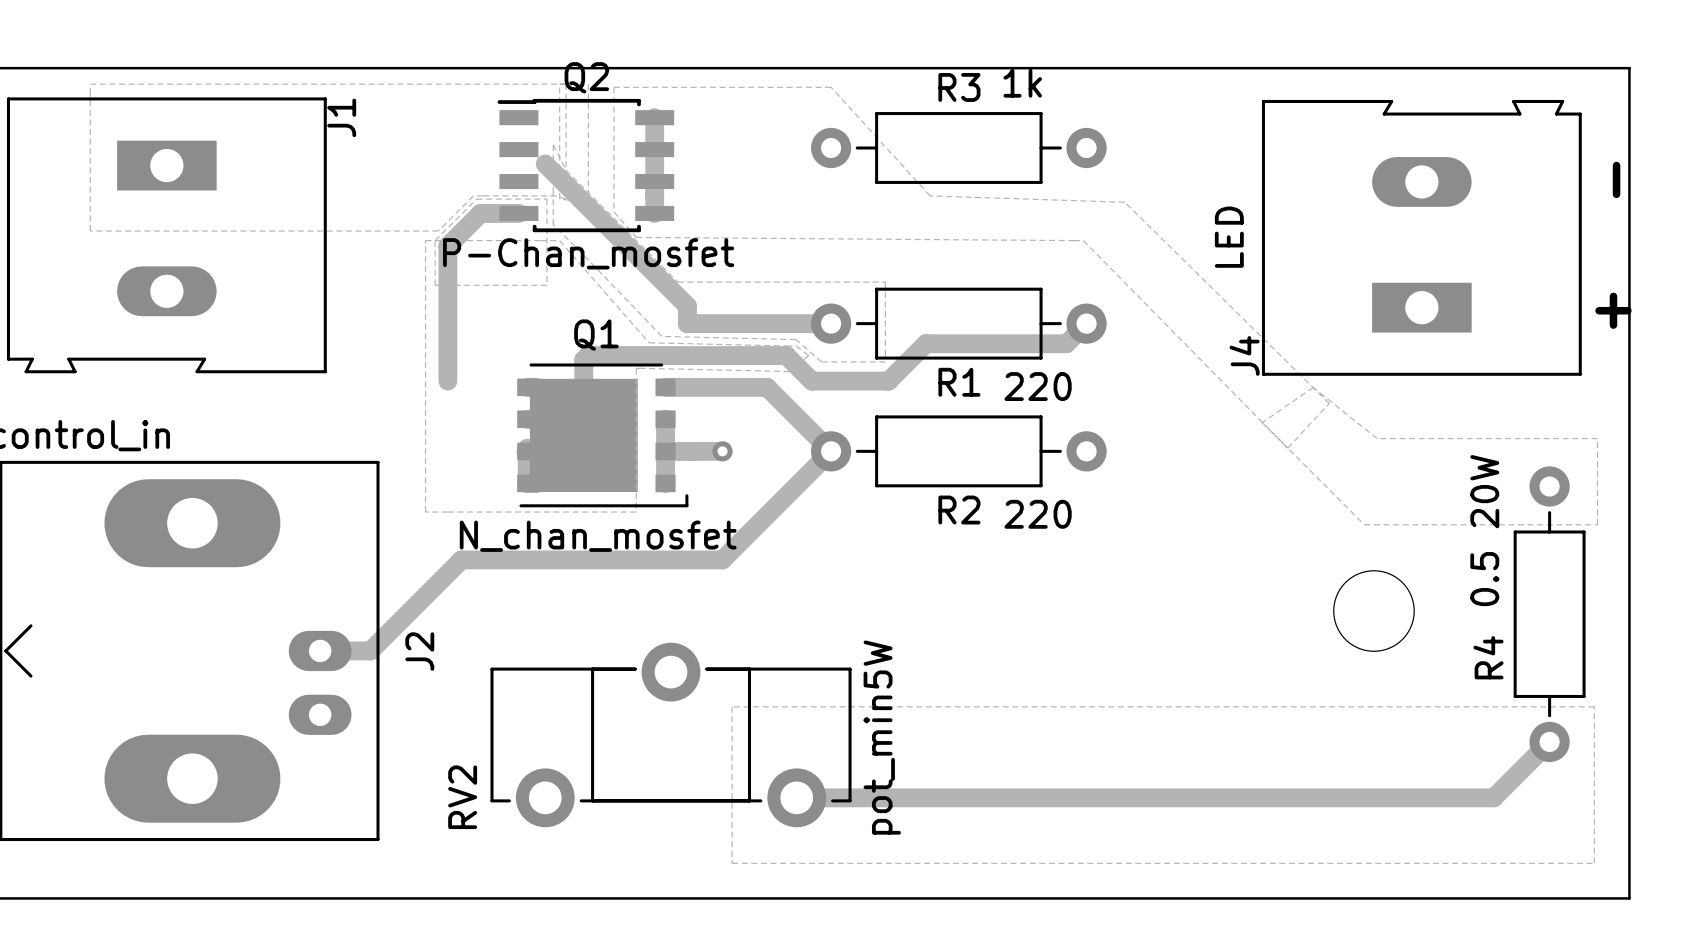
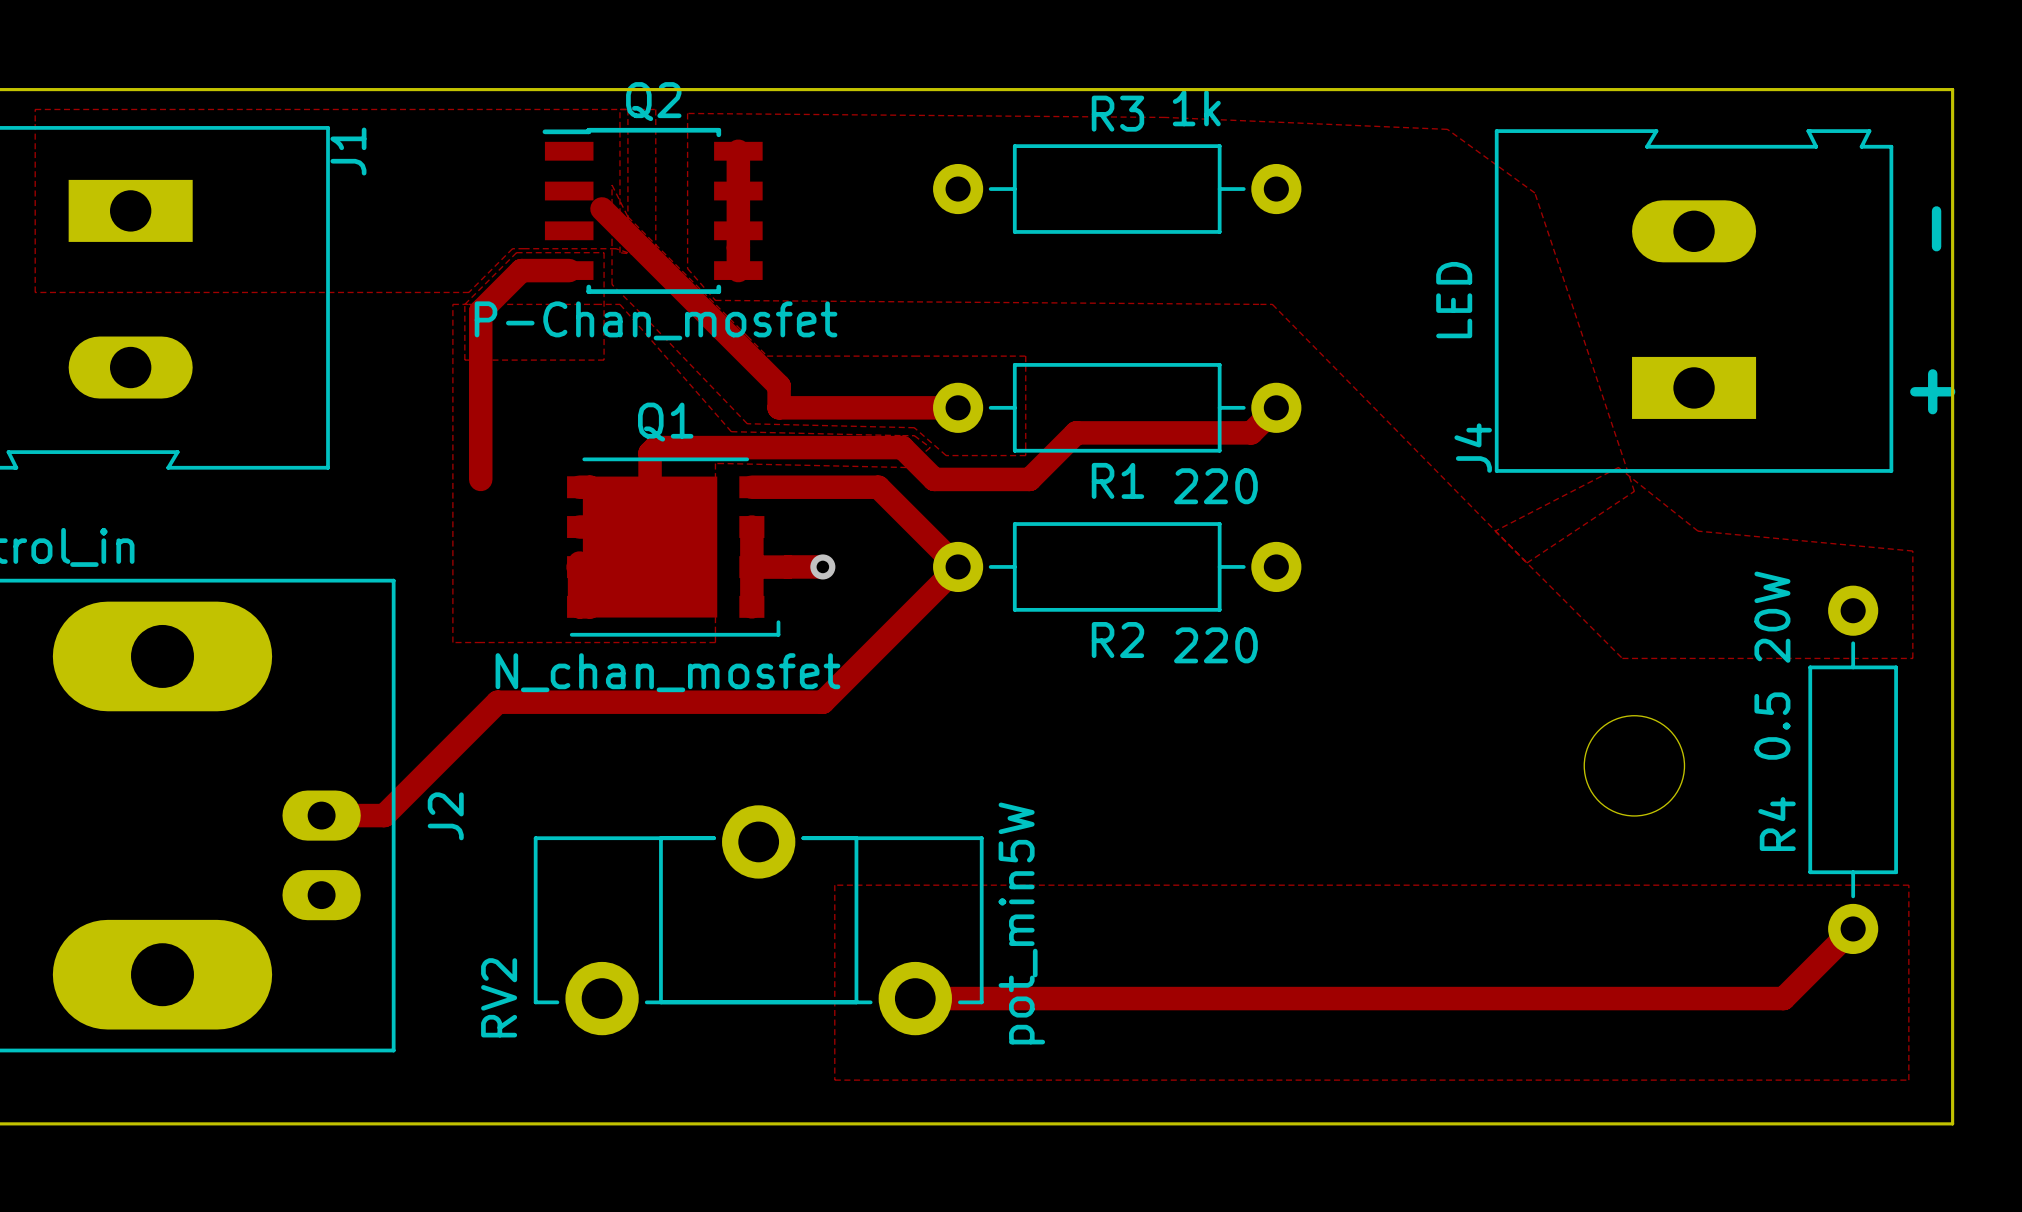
zone outline: (613, 87) (831, 87) (930, 195) (1124, 202) (1329, 403) (1287, 448) -> (687, 113) (1164, 117) (1447, 129) (1534, 193) (1634, 491) (1526, 562)
zone outline: (1262, 422) (1313, 387) (1377, 438) (1597, 438) -> (1495, 531) (1618, 467) (1698, 531) (1912, 551)

